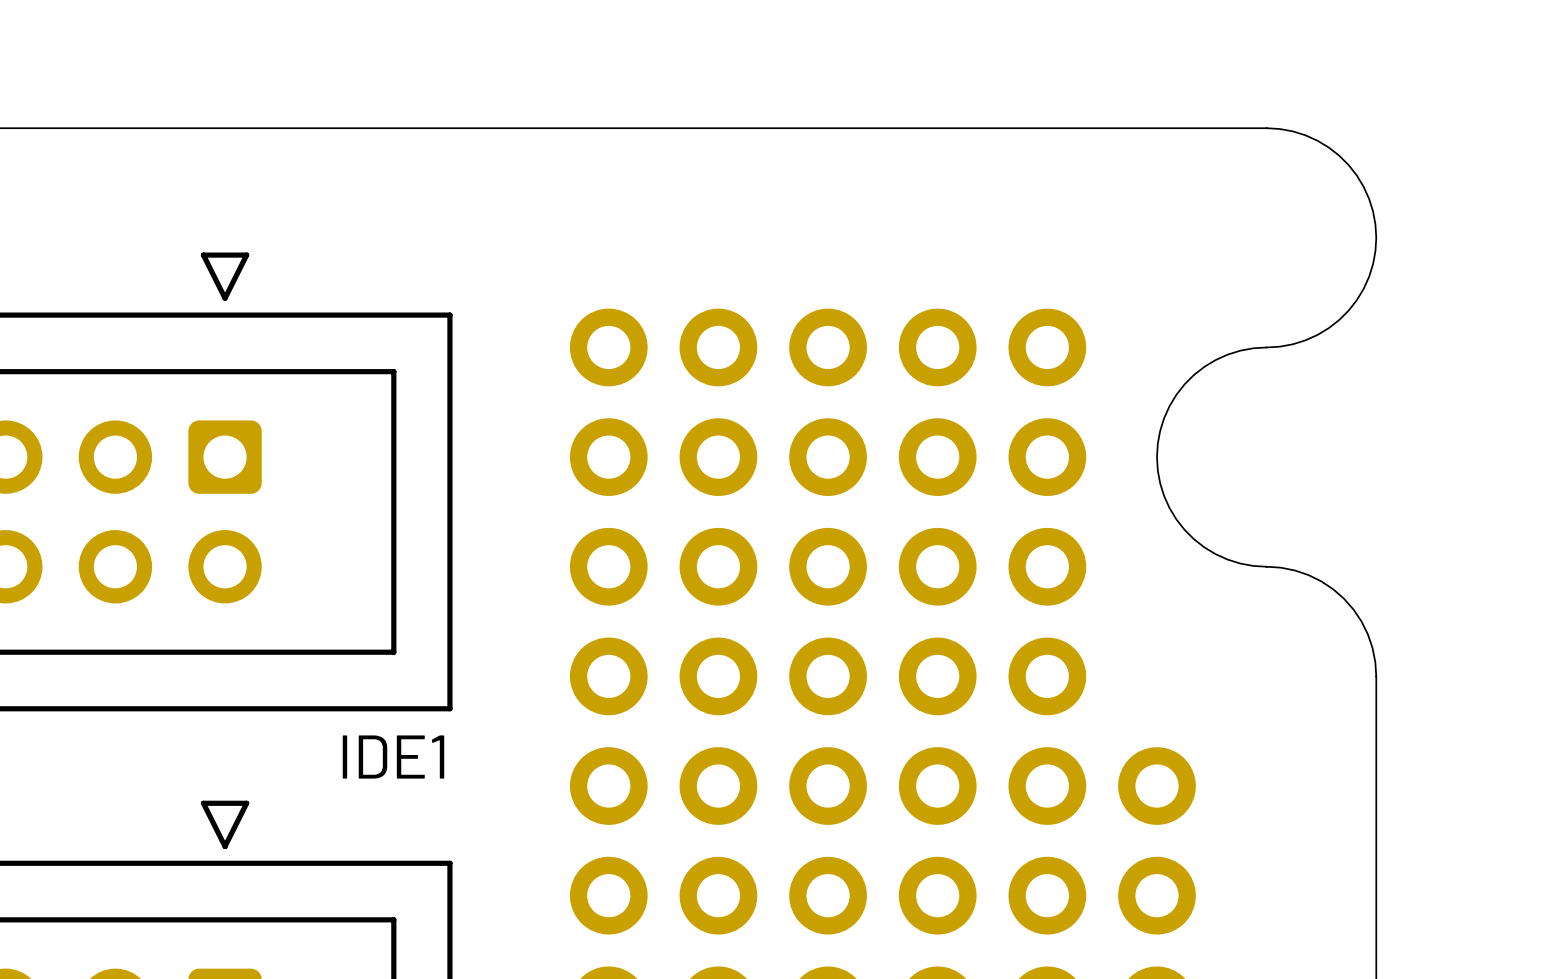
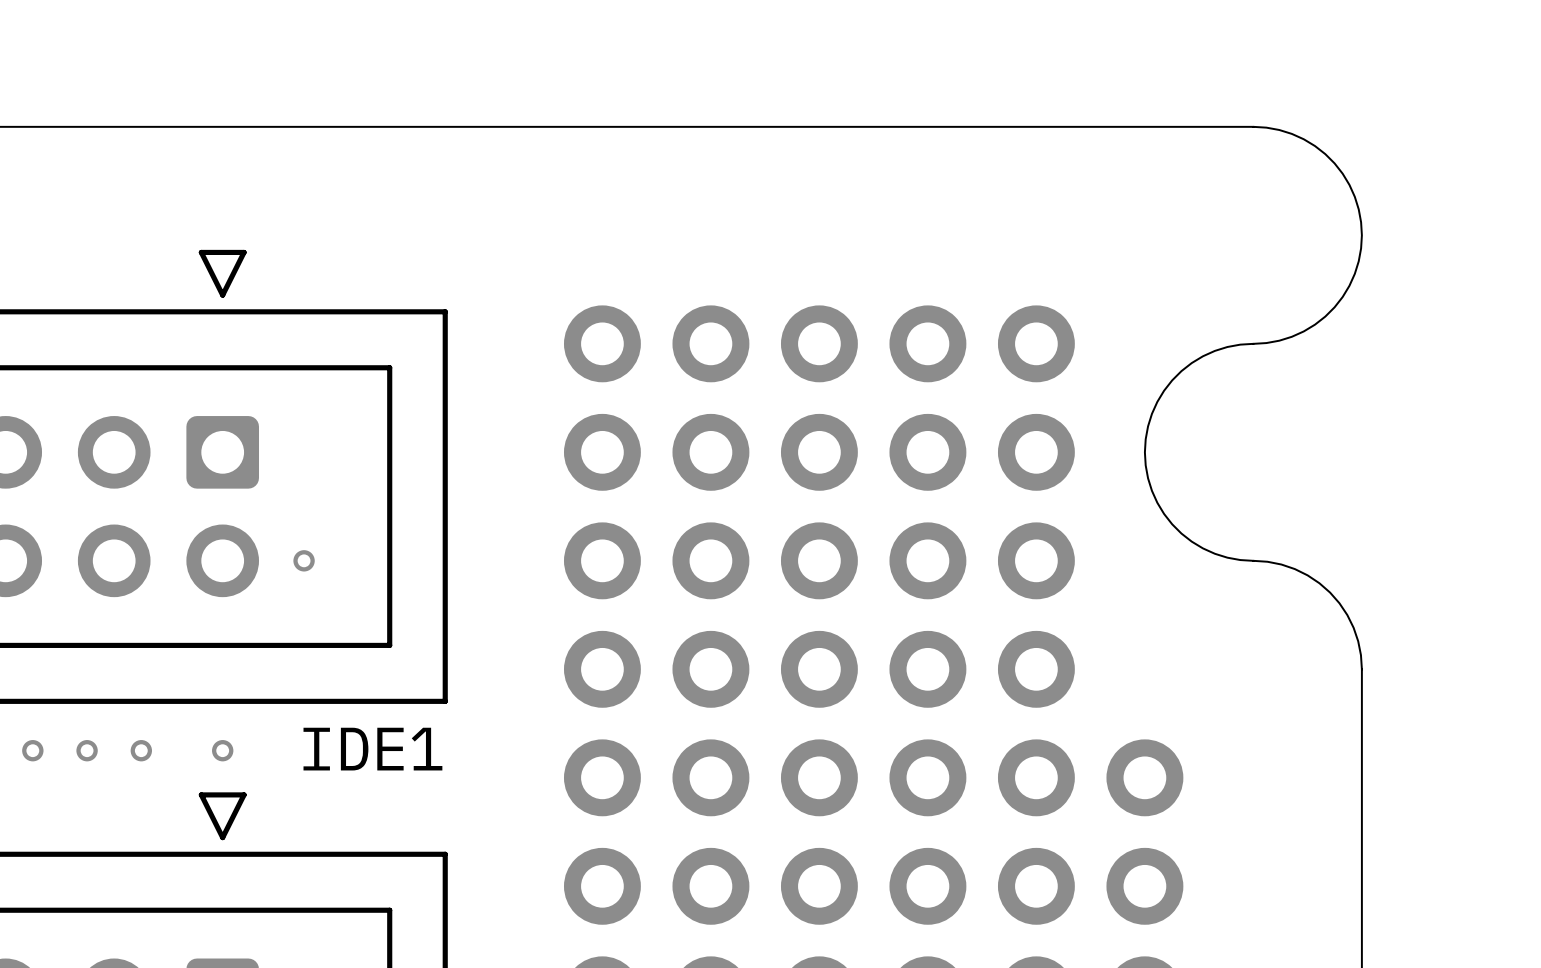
via: none -> (304, 560)
via: none -> (32, 750)
via: none -> (87, 750)
via: none -> (141, 750)
via: none -> (222, 750)

